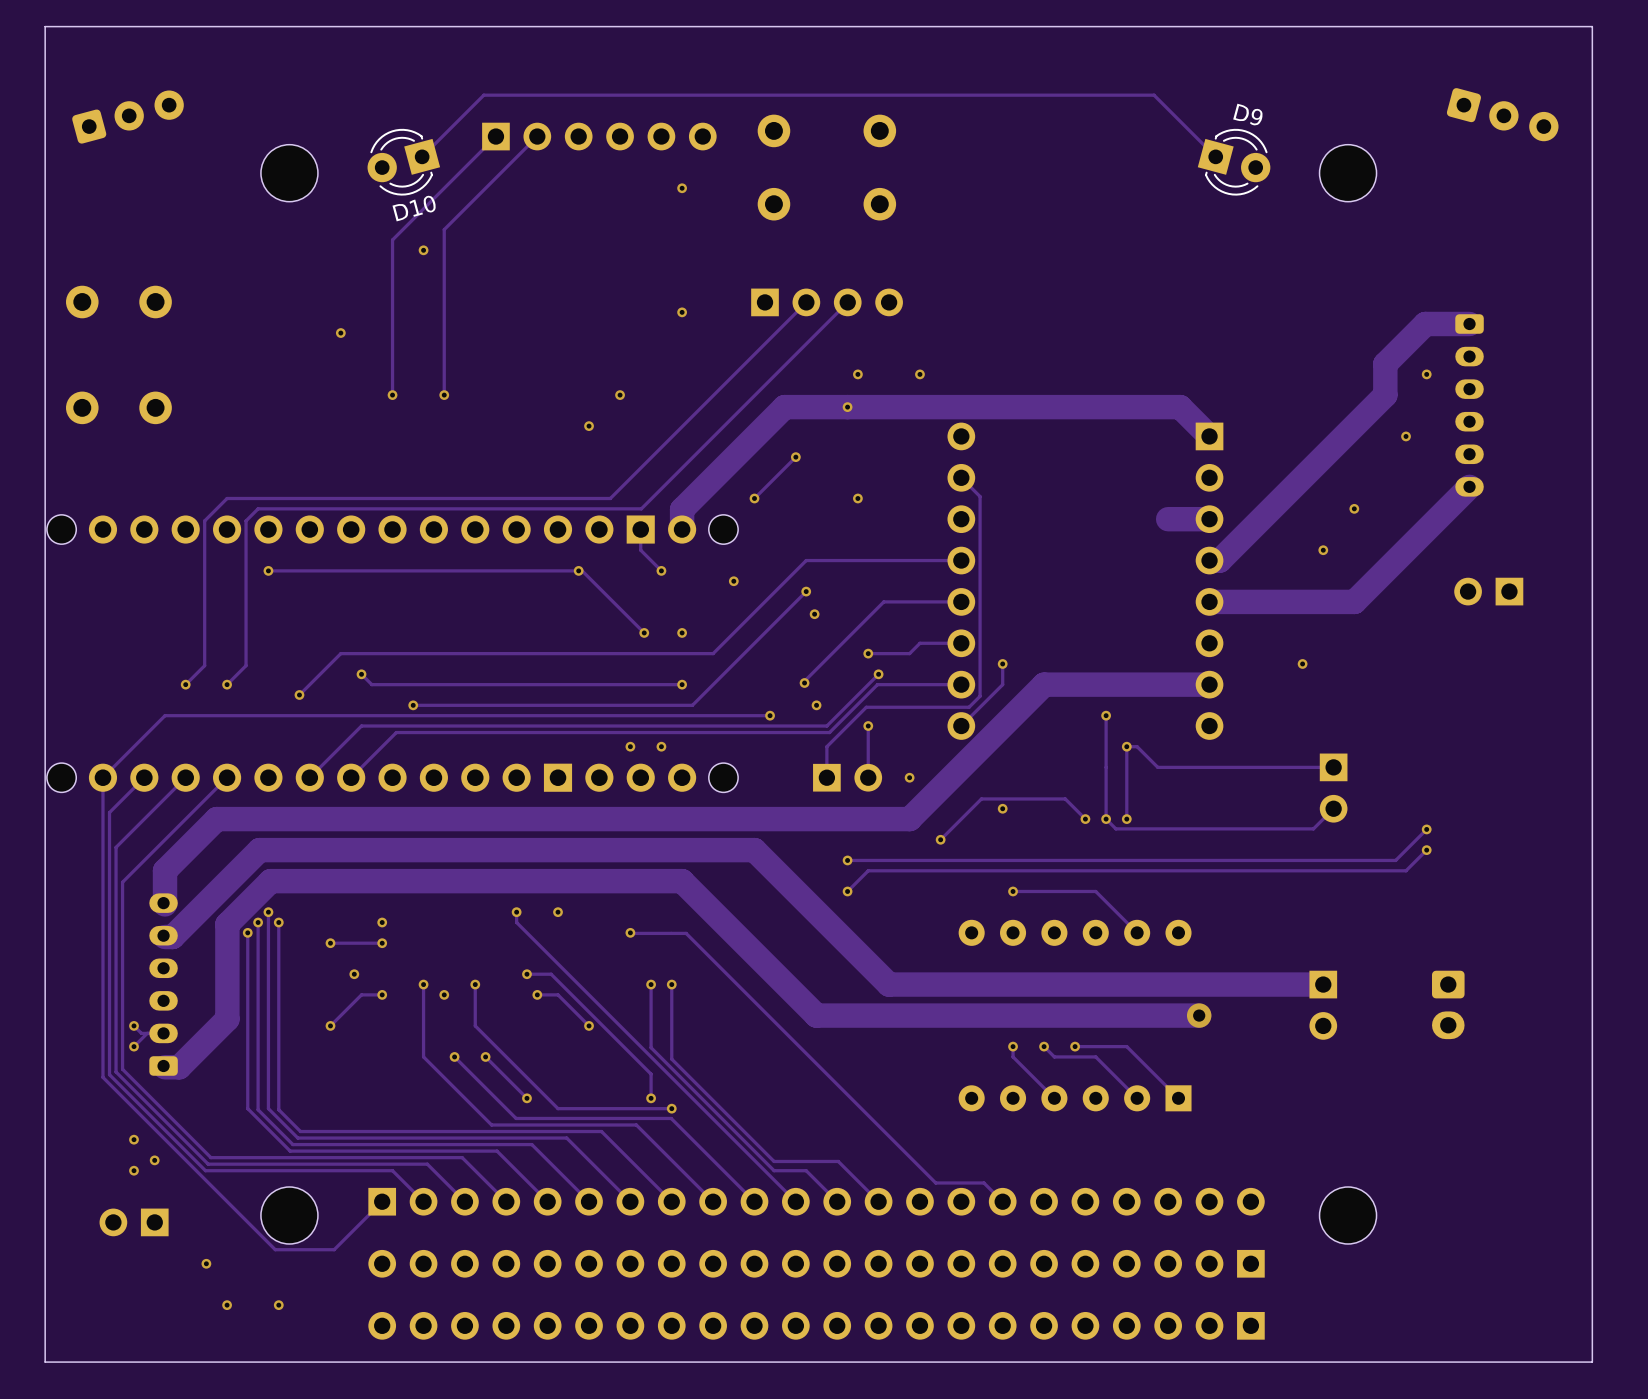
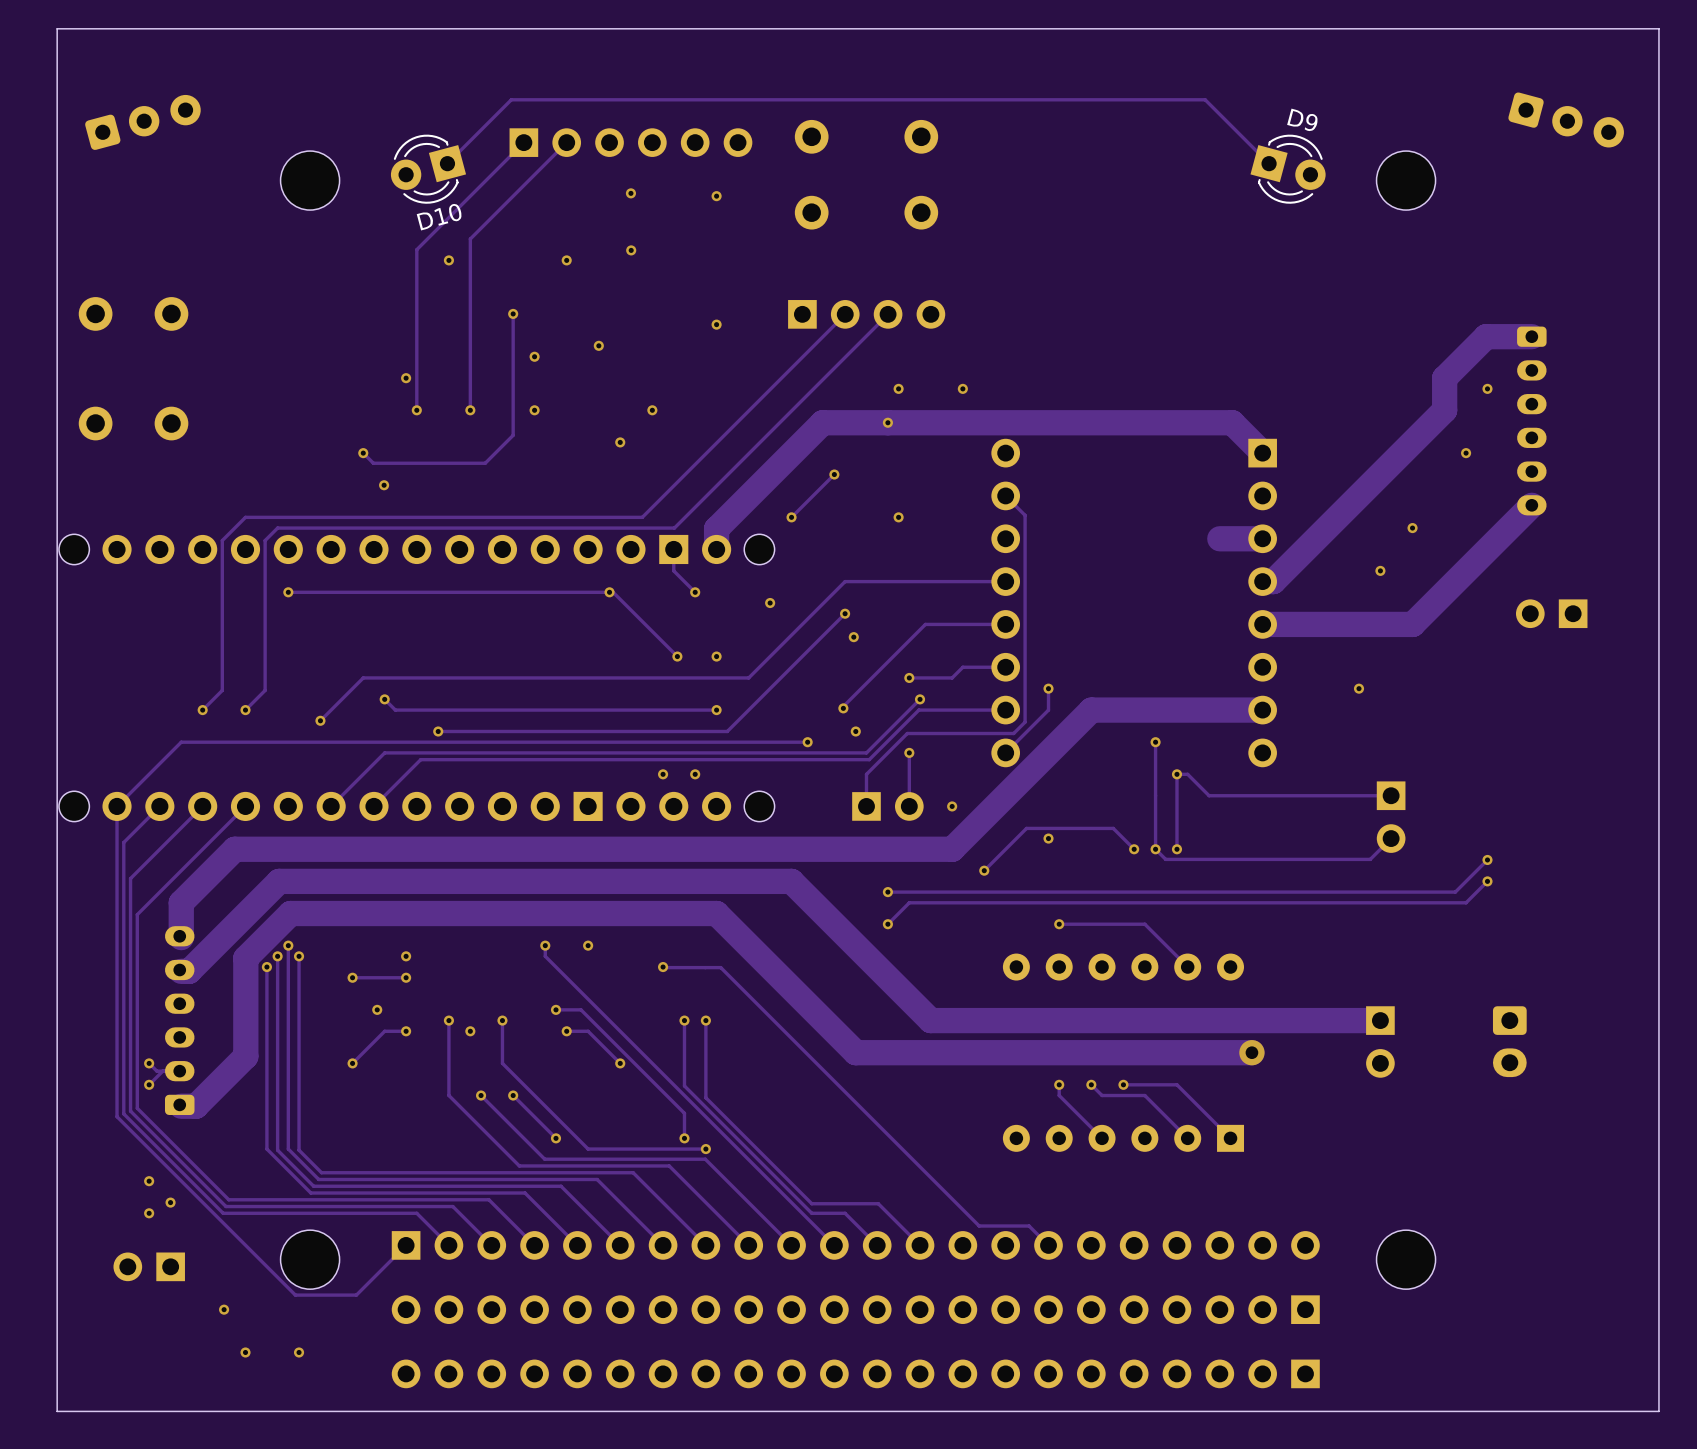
via: none -> (630, 193)
via: none -> (631, 250)
via: none -> (566, 260)
track: none -> (513, 313) (513, 435) (485, 463) (373, 463) (363, 453)
via: none -> (513, 313)
via: none -> (598, 345)
via: (340, 333) -> none
via: none -> (534, 356)
via: none -> (406, 378)
via: none -> (534, 410)
via: none -> (363, 453)
via: none -> (384, 485)

